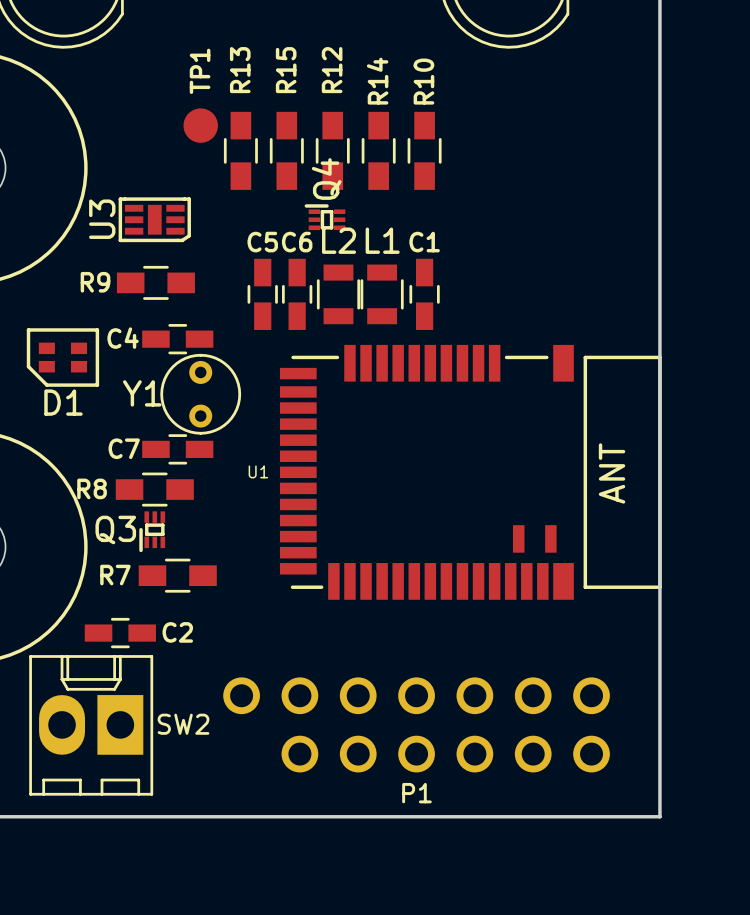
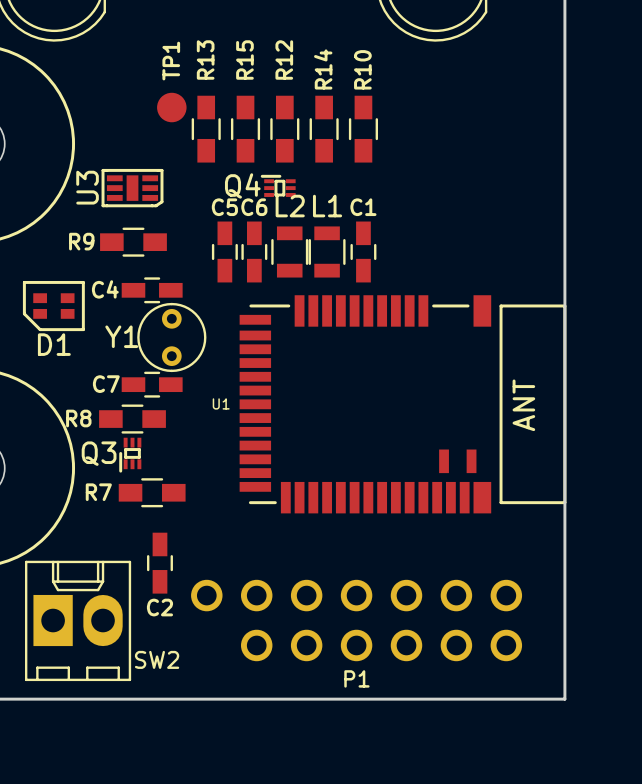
Q4 name rotation: 0° (326, 179) -> 90° clockwise (242, 185)
C2 rotation: 0° (120, 633) -> 90° clockwise (159, 563)
C2 position: (120, 633) -> (159, 563)
SW2 footprint: [29, 655, 154, 796] -> [24, 560, 132, 682]
SW2 name position: SW2 (183, 724) -> SW2 (157, 659)

